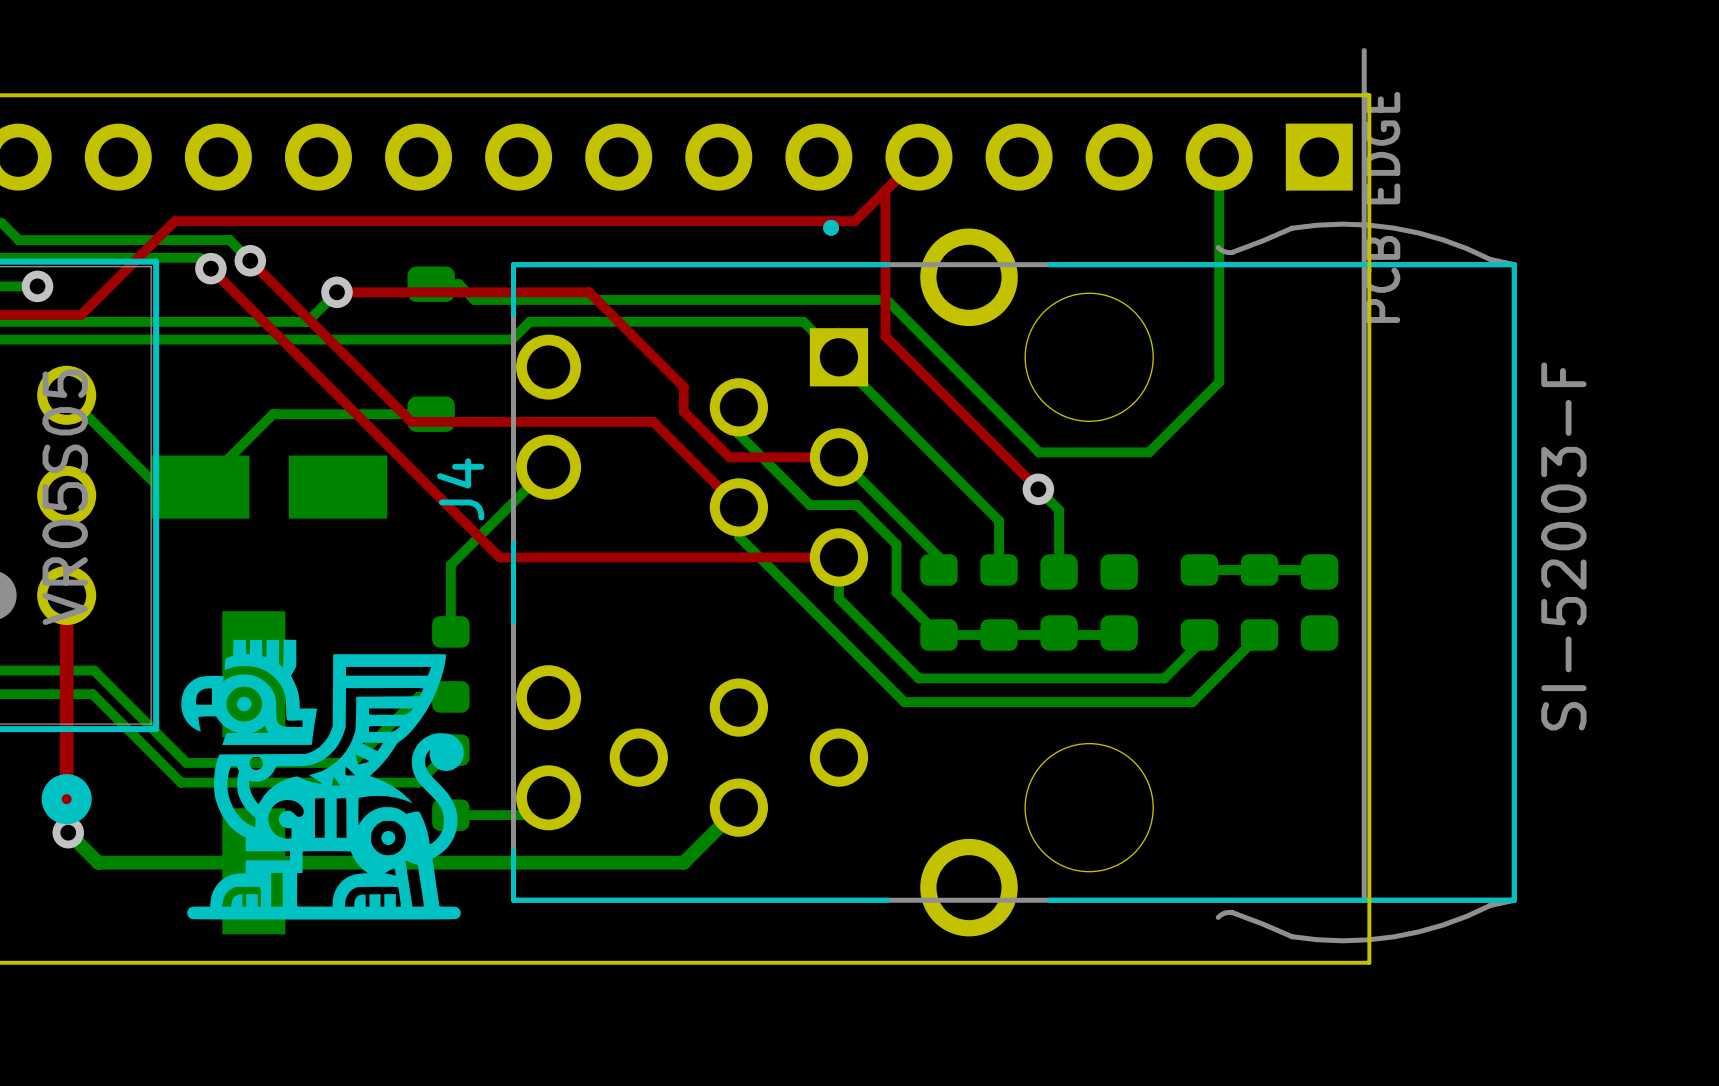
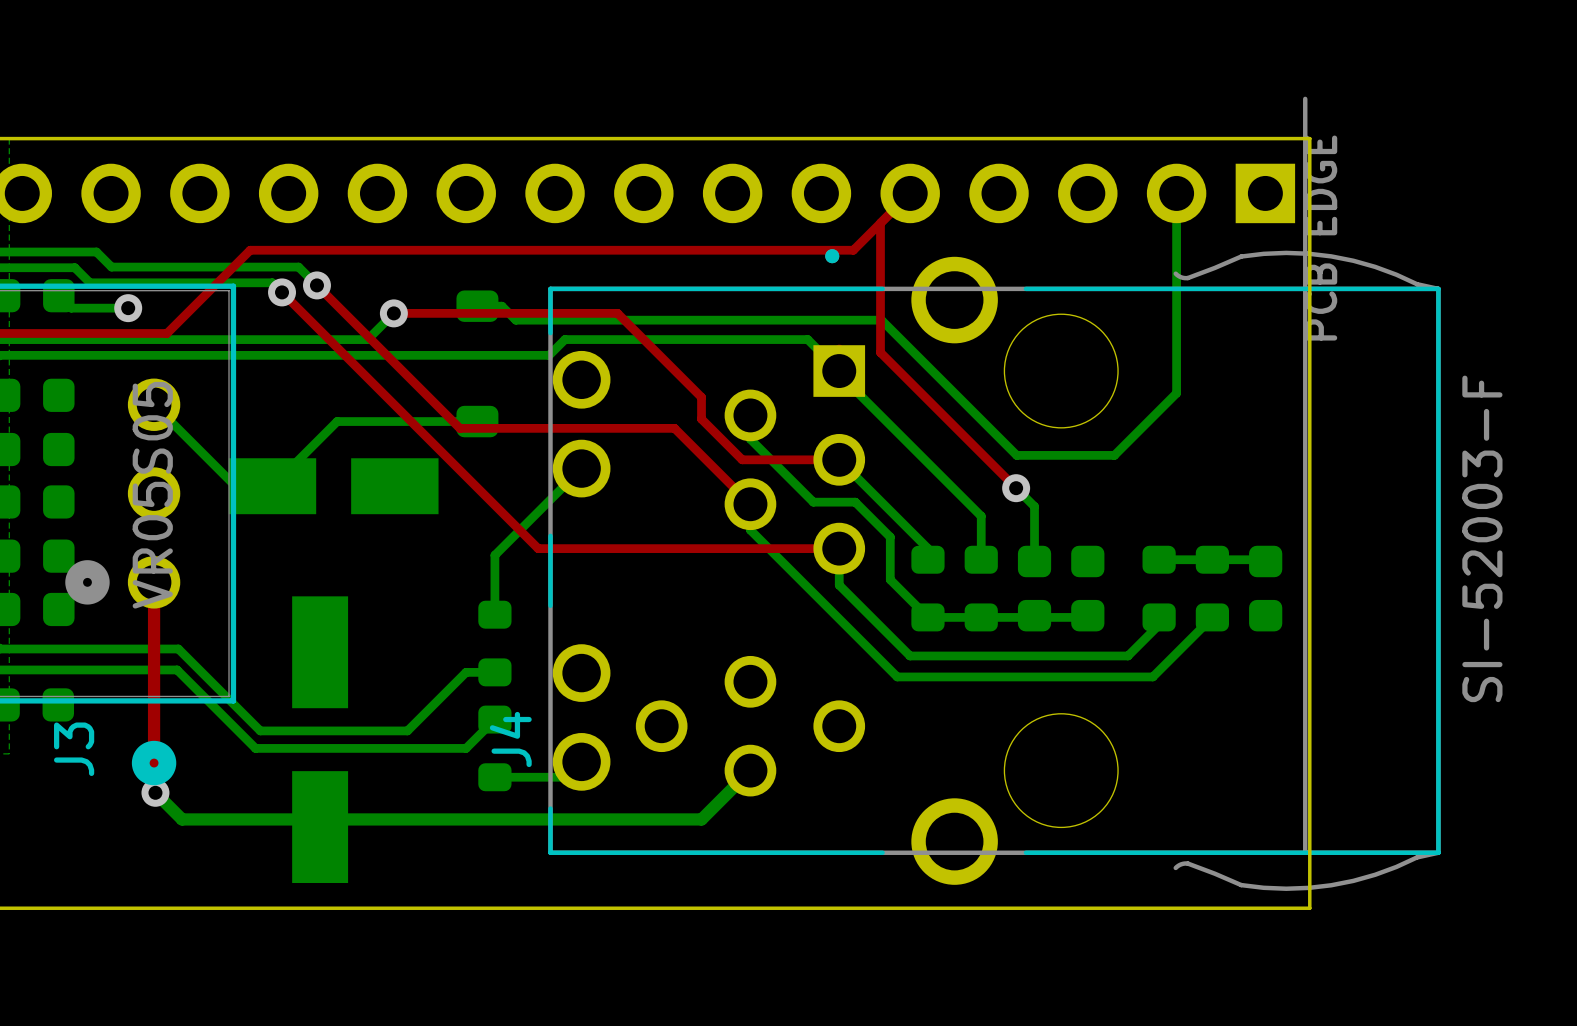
J4 name position: J4 (460, 489) -> J4 (510, 739)
drawing: [181, 639, 464, 920] -> none

